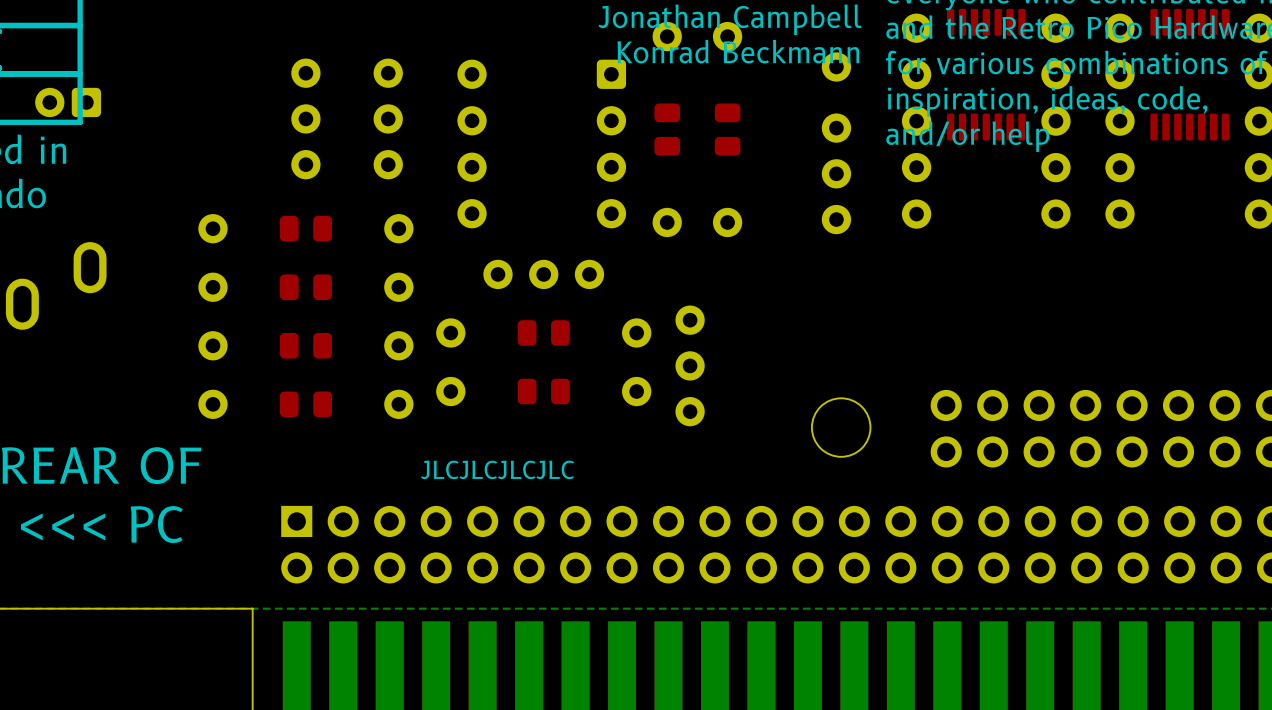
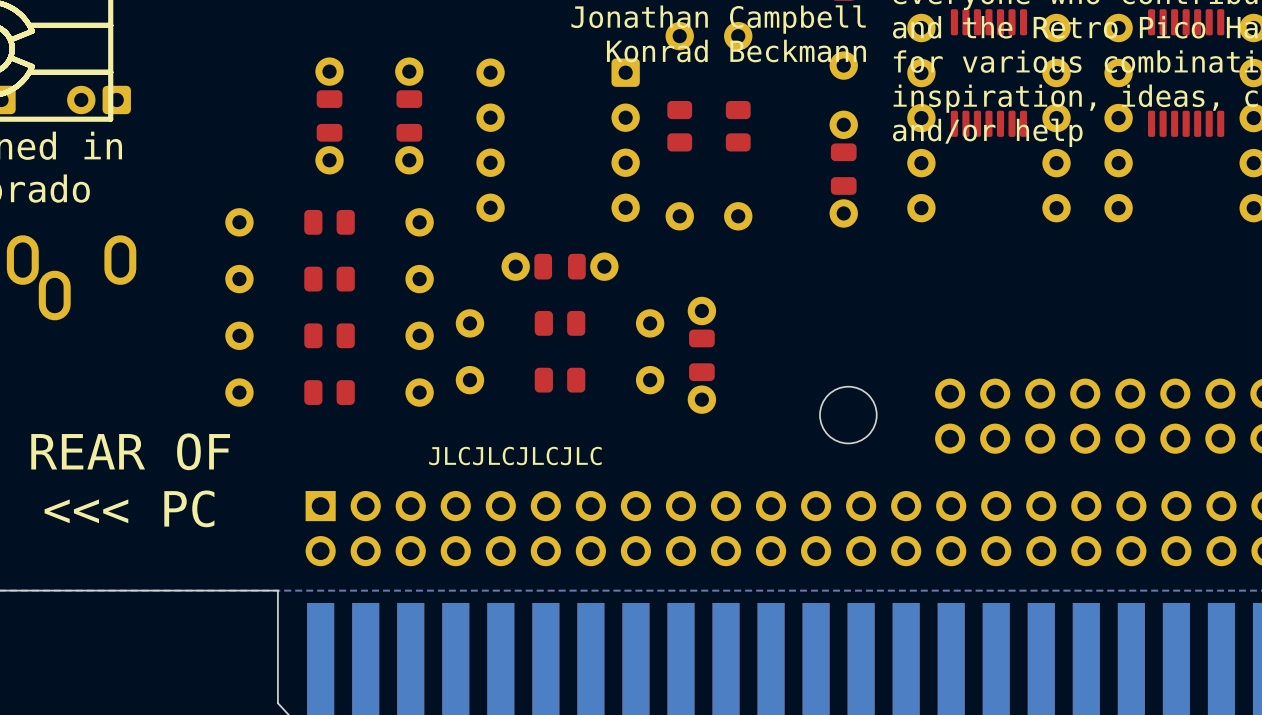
part footprint: [291, 58, 321, 180] -> [315, 57, 344, 175]
part footprint: [373, 58, 403, 180] -> [395, 57, 424, 175]
part footprint: [821, 113, 852, 235] -> [829, 110, 858, 228]
part footprint: [483, 259, 605, 290] -> [501, 252, 619, 281]
part footprint: [675, 305, 705, 427] -> [687, 296, 717, 414]

